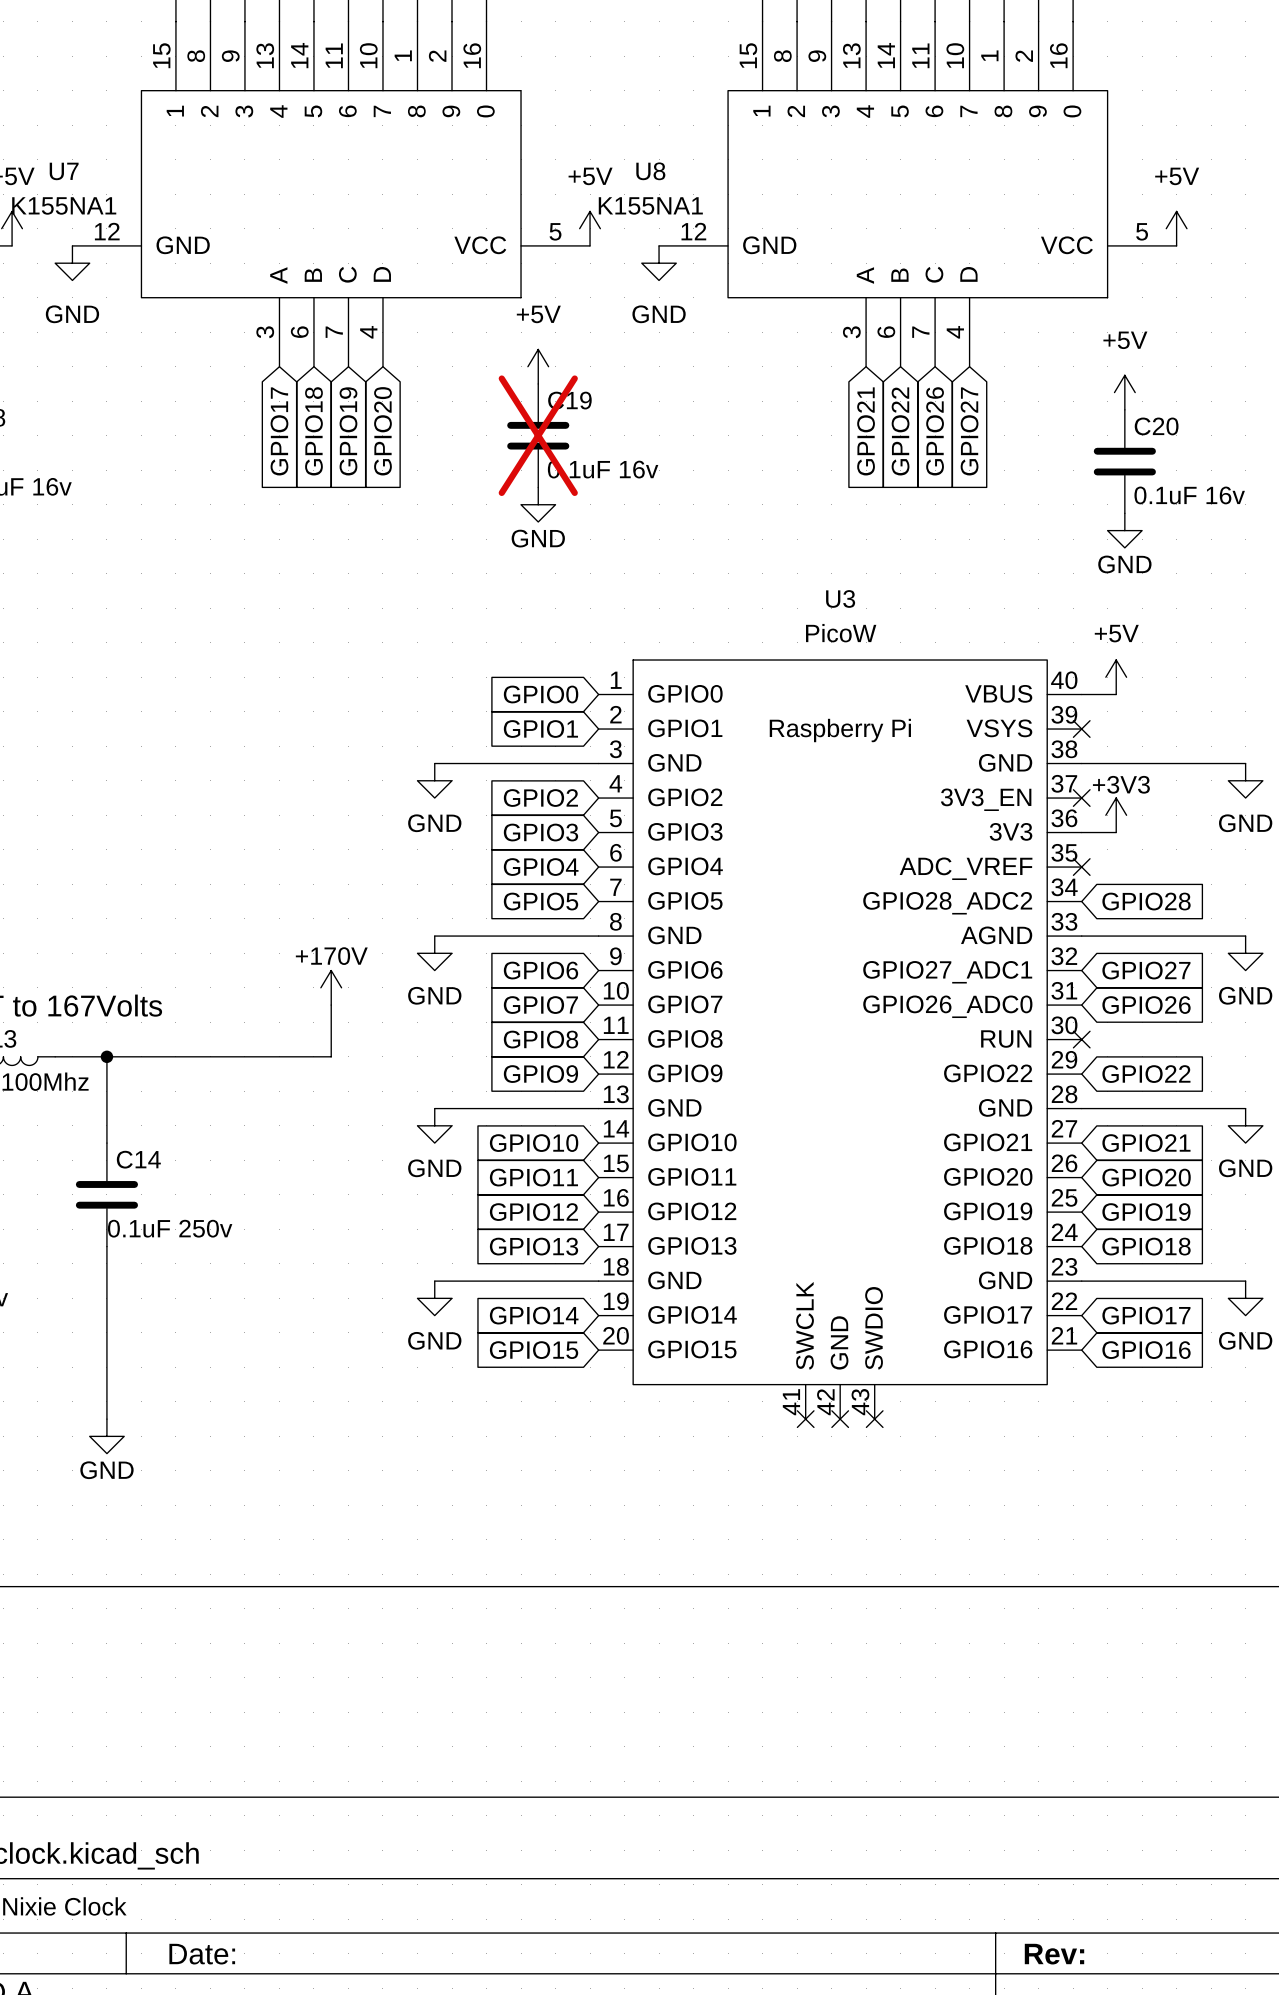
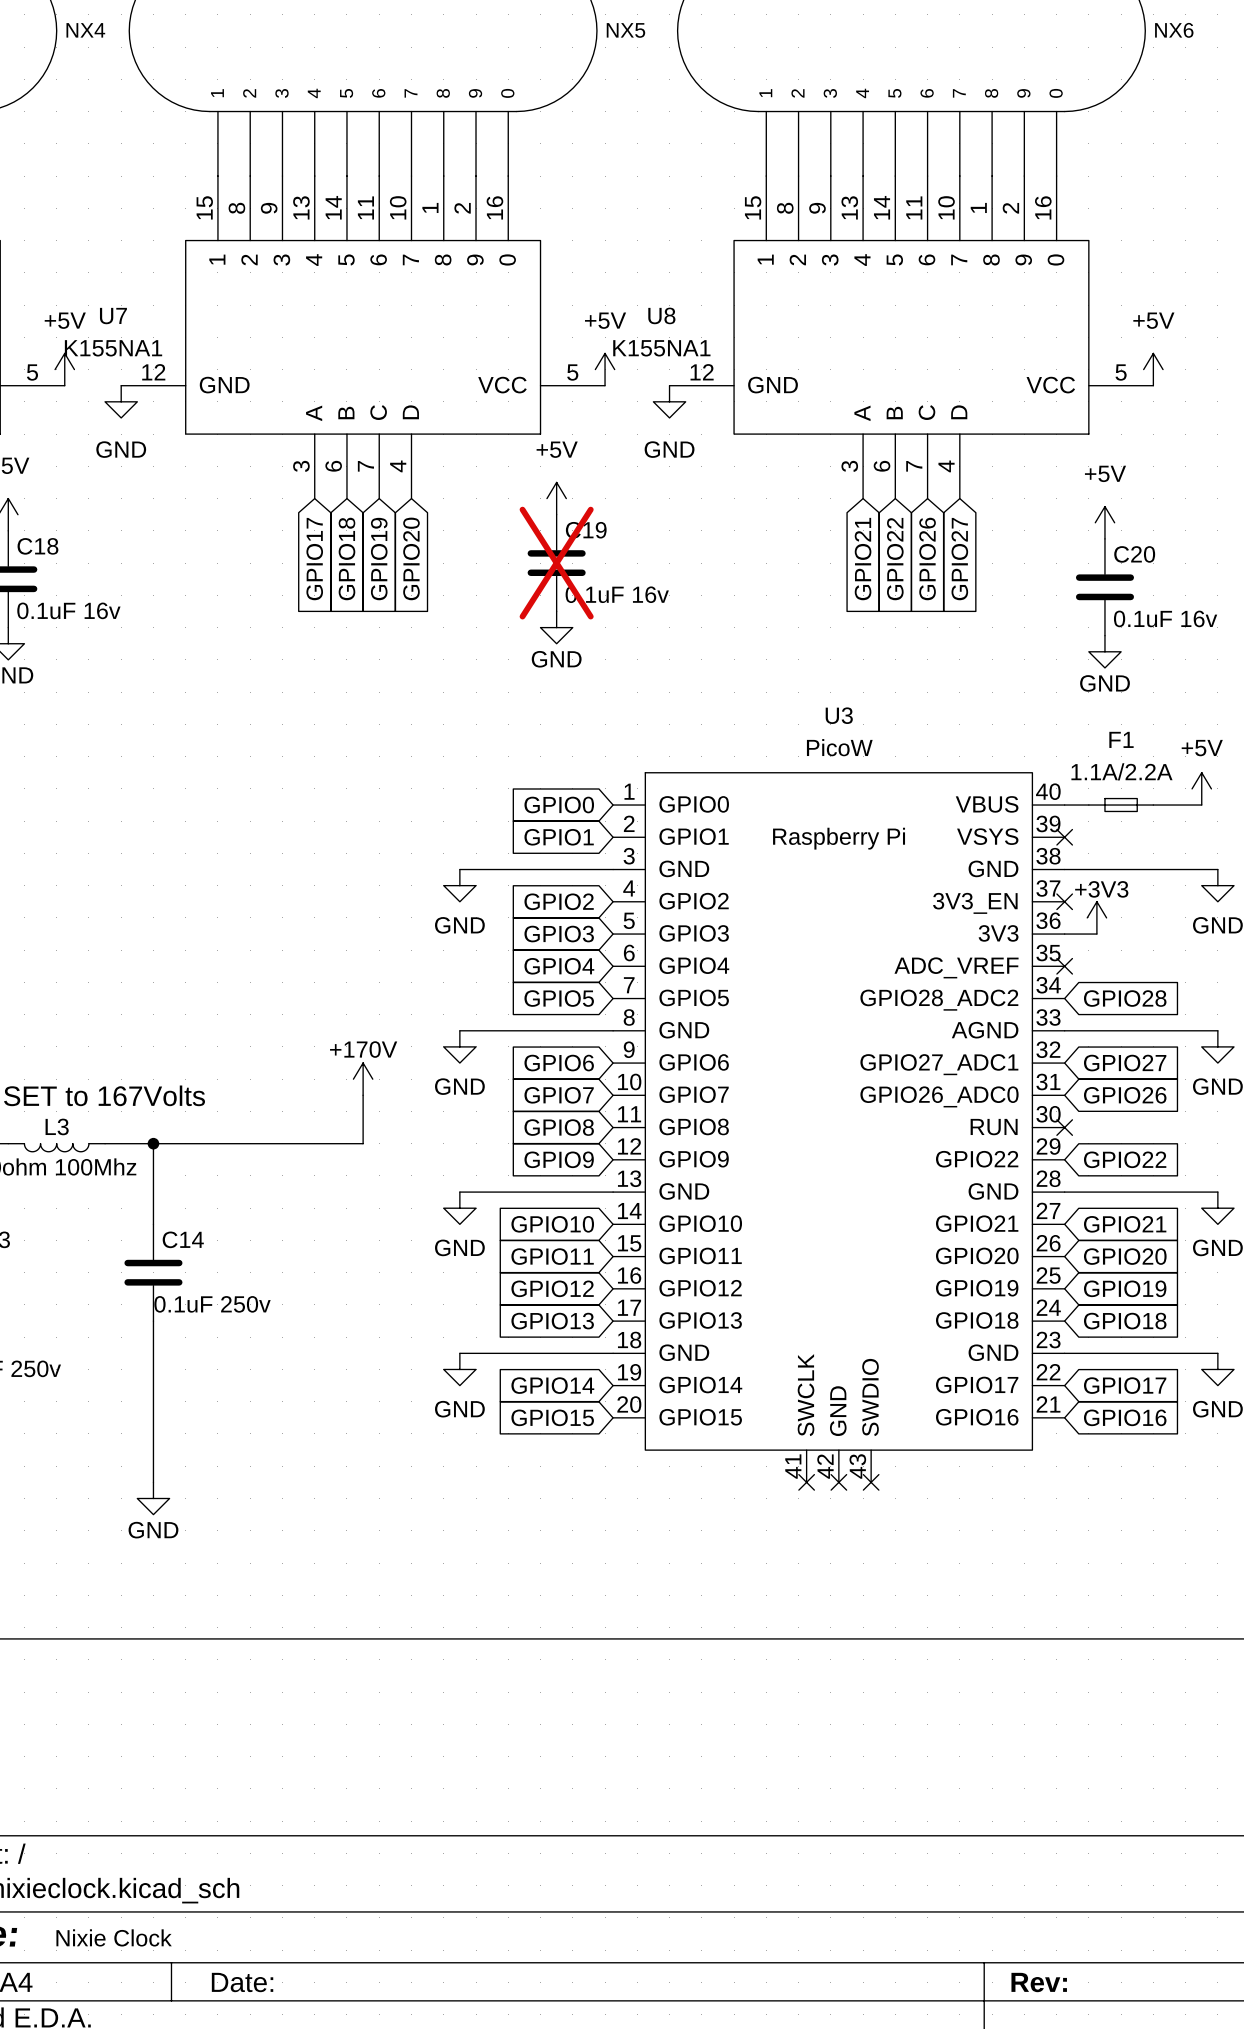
power symbol position: +5V (1116, 677) -> +5V (1201, 788)
F1: none -> 1.1A/2.2A (1121, 805)
wire: none -> (1153, 805) (1201, 805)

